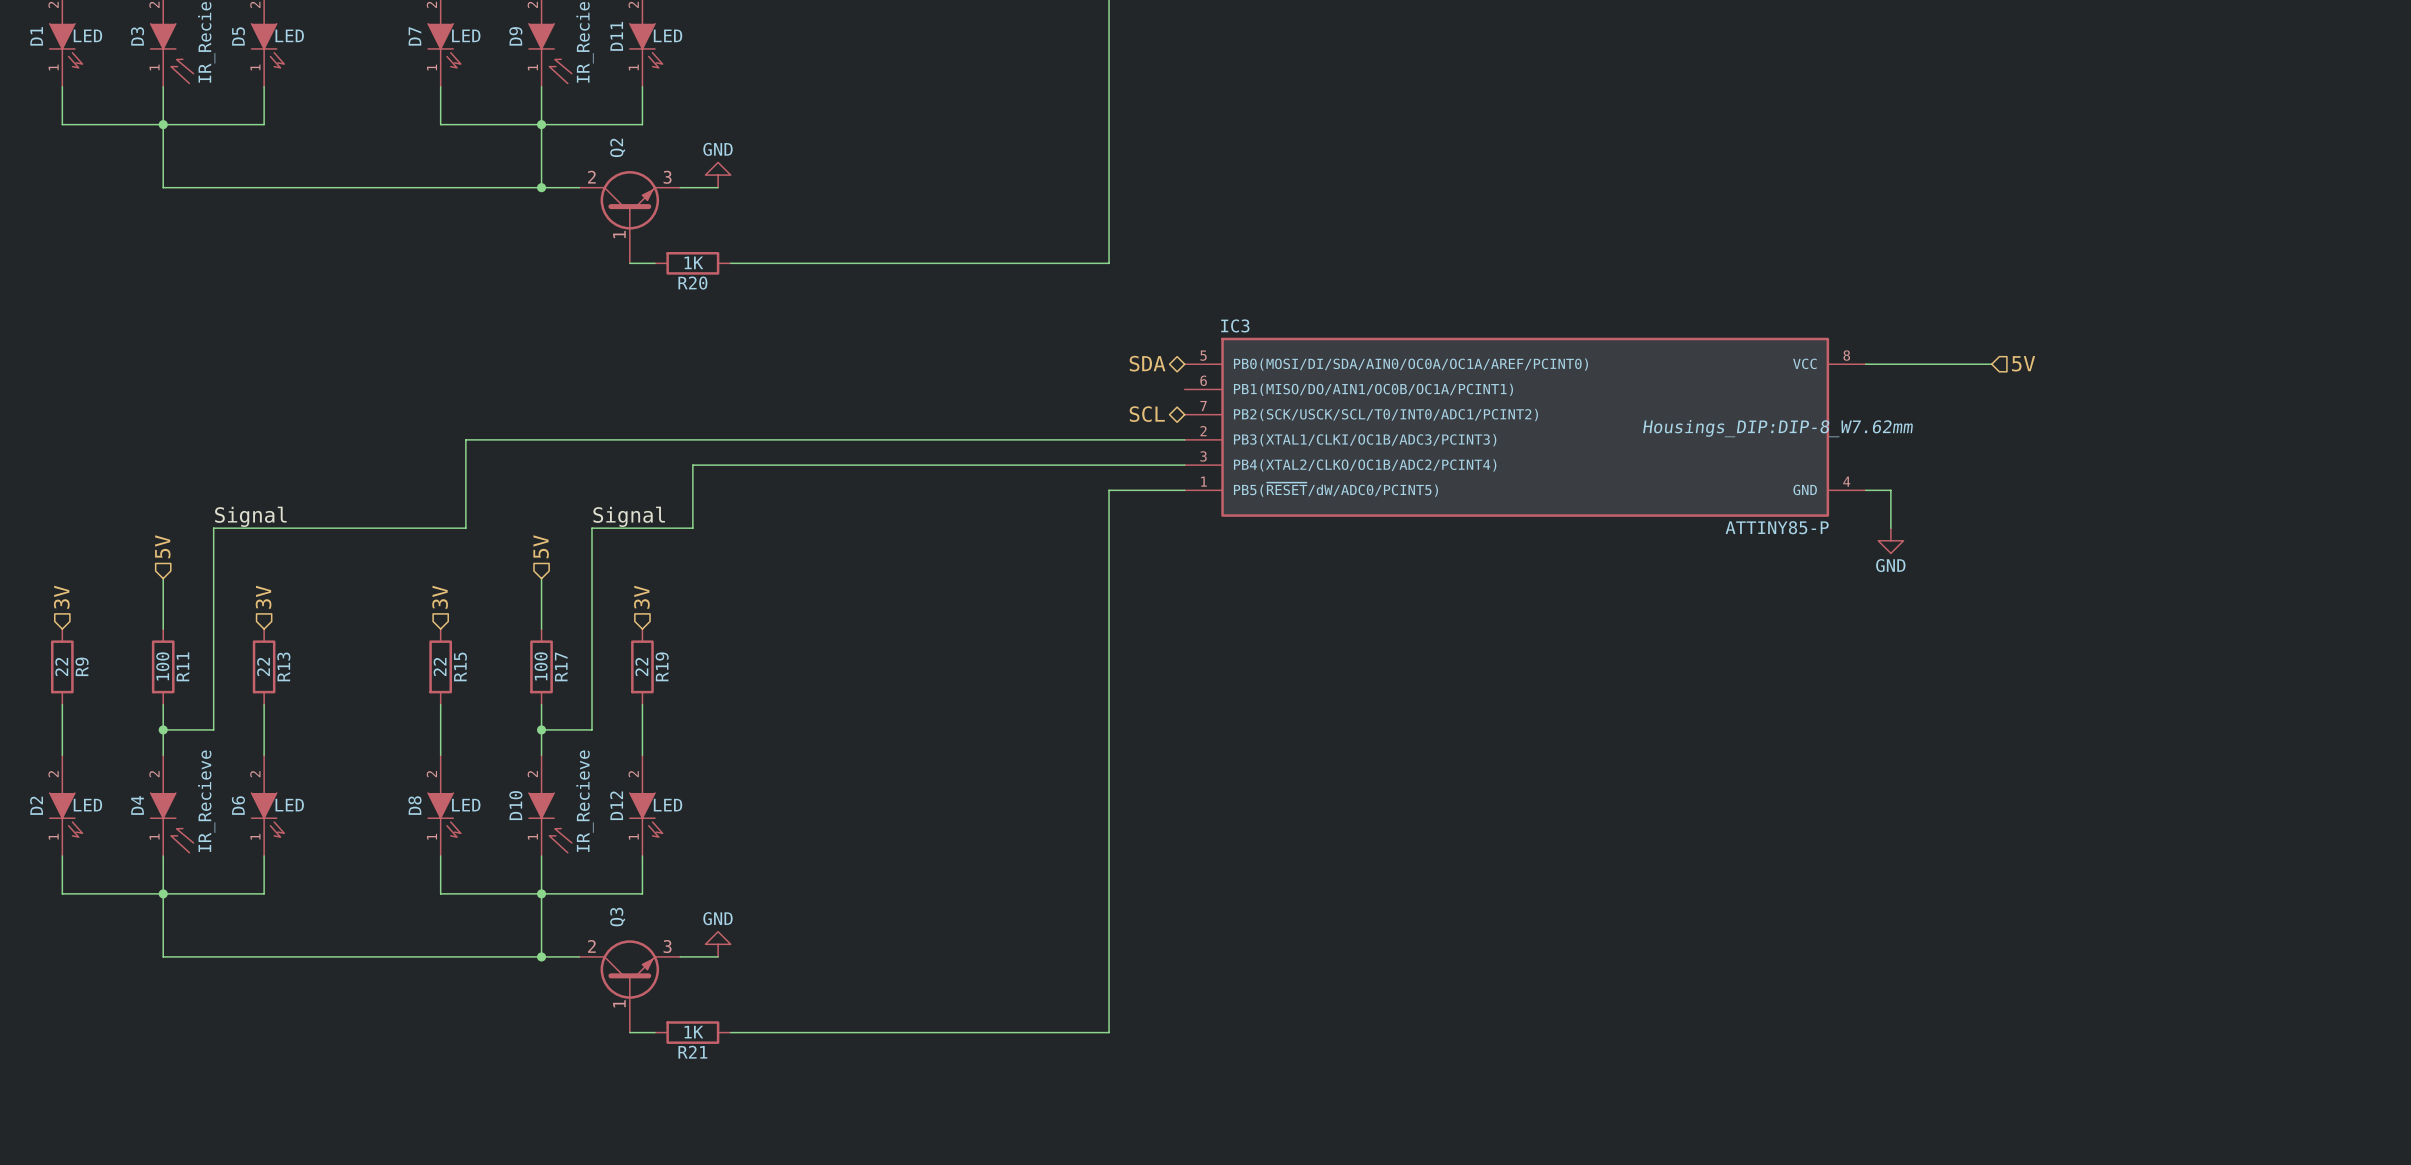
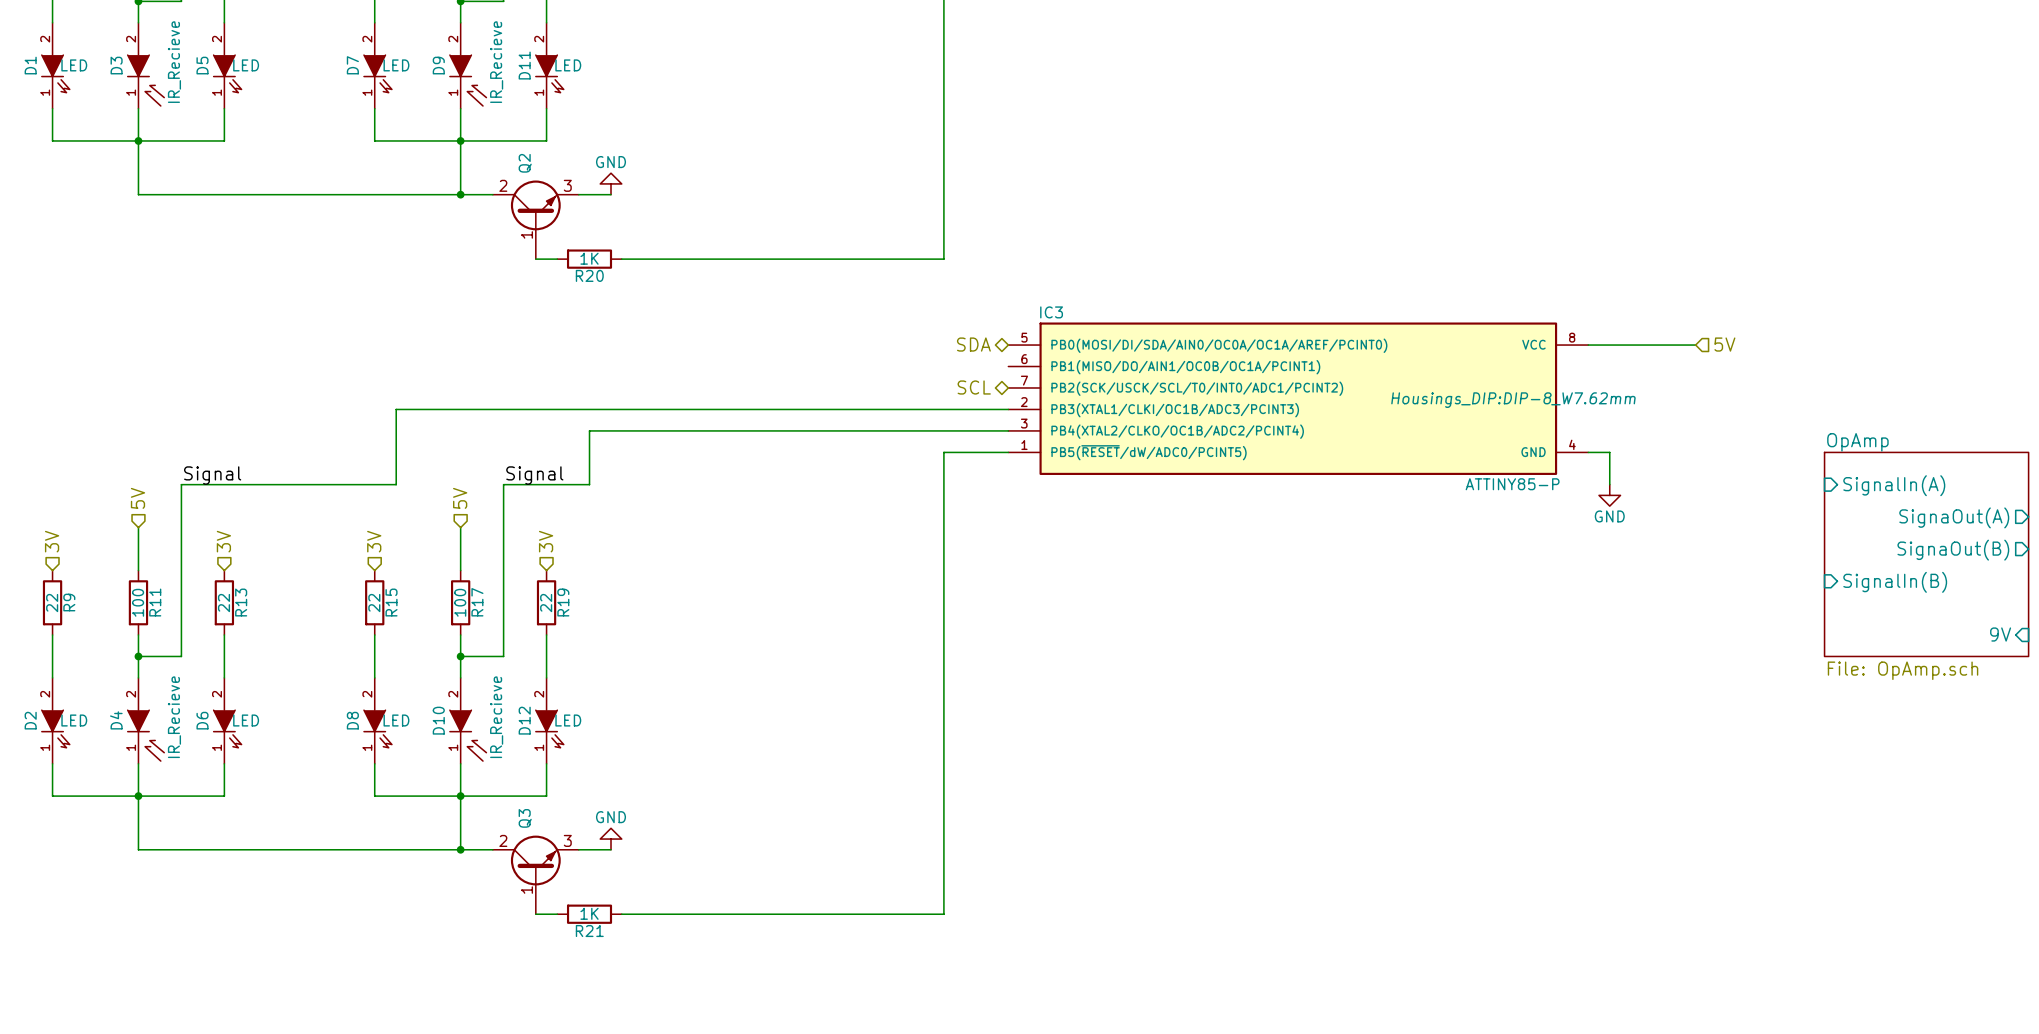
sheet pin: none -> SignalIn(A) (1894, 485)
sheet pin: none -> SignaOut(A) (1954, 517)
sheet pin: none -> SignaOut(B) (1953, 550)
sheet OpAmp: none -> File: OpAmp.sch (1926, 554)
sheet pin: none -> SignalIn(B) (1895, 582)
sheet pin: none -> 9V (2000, 634)

